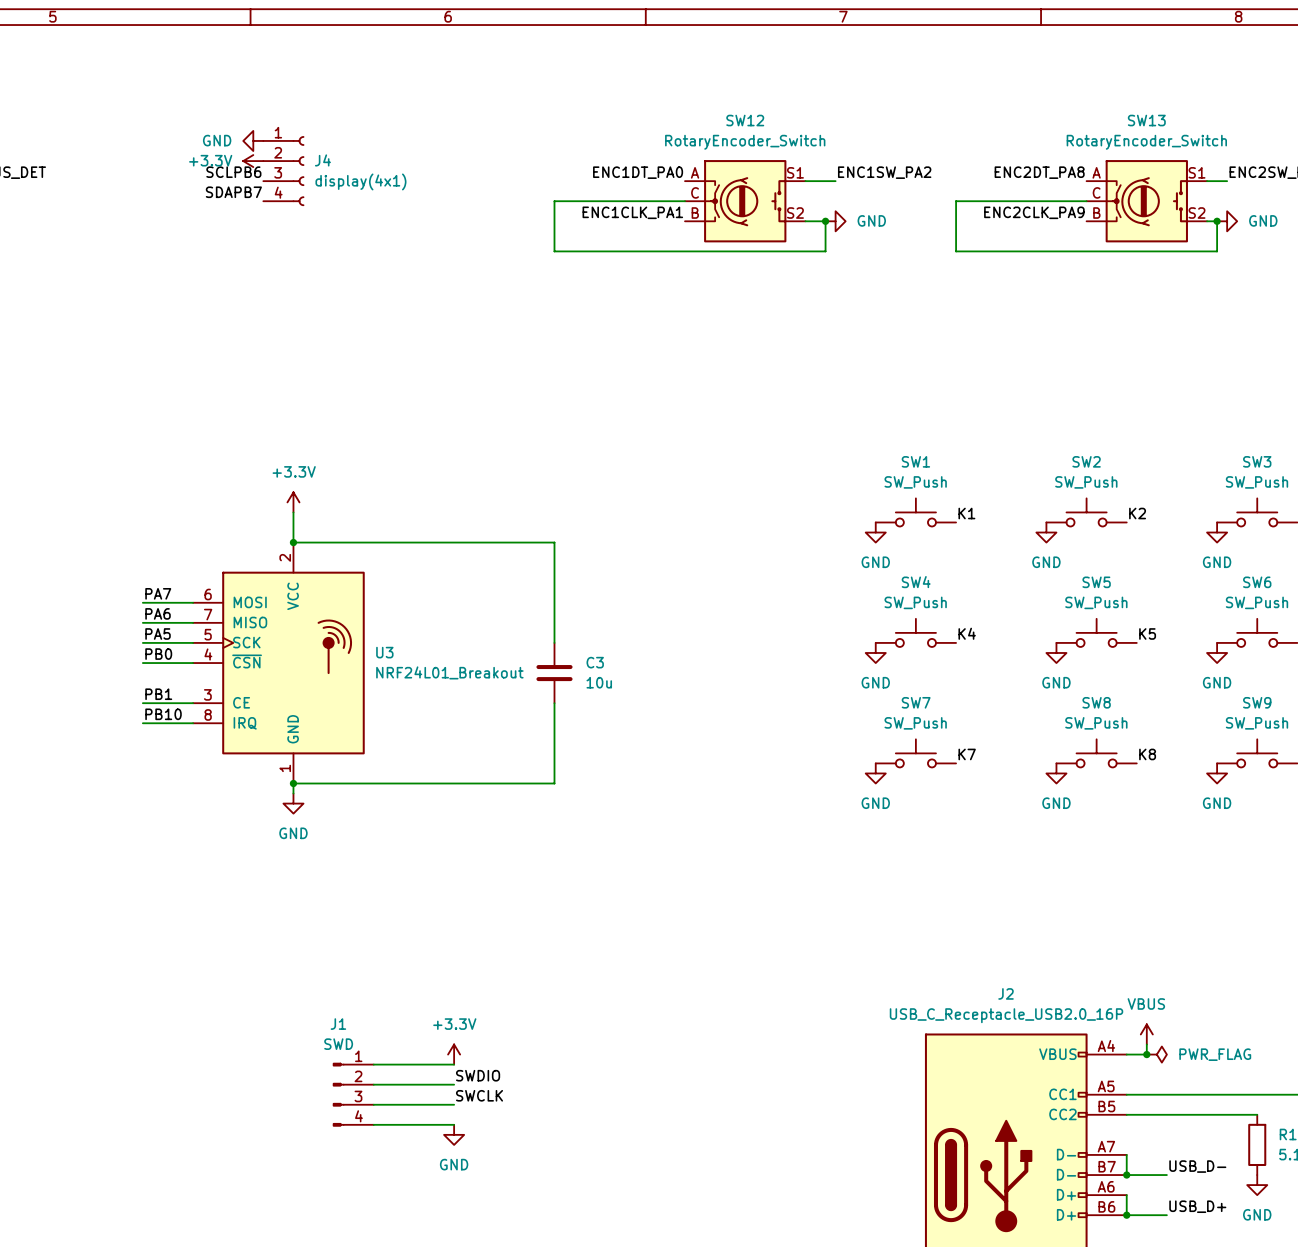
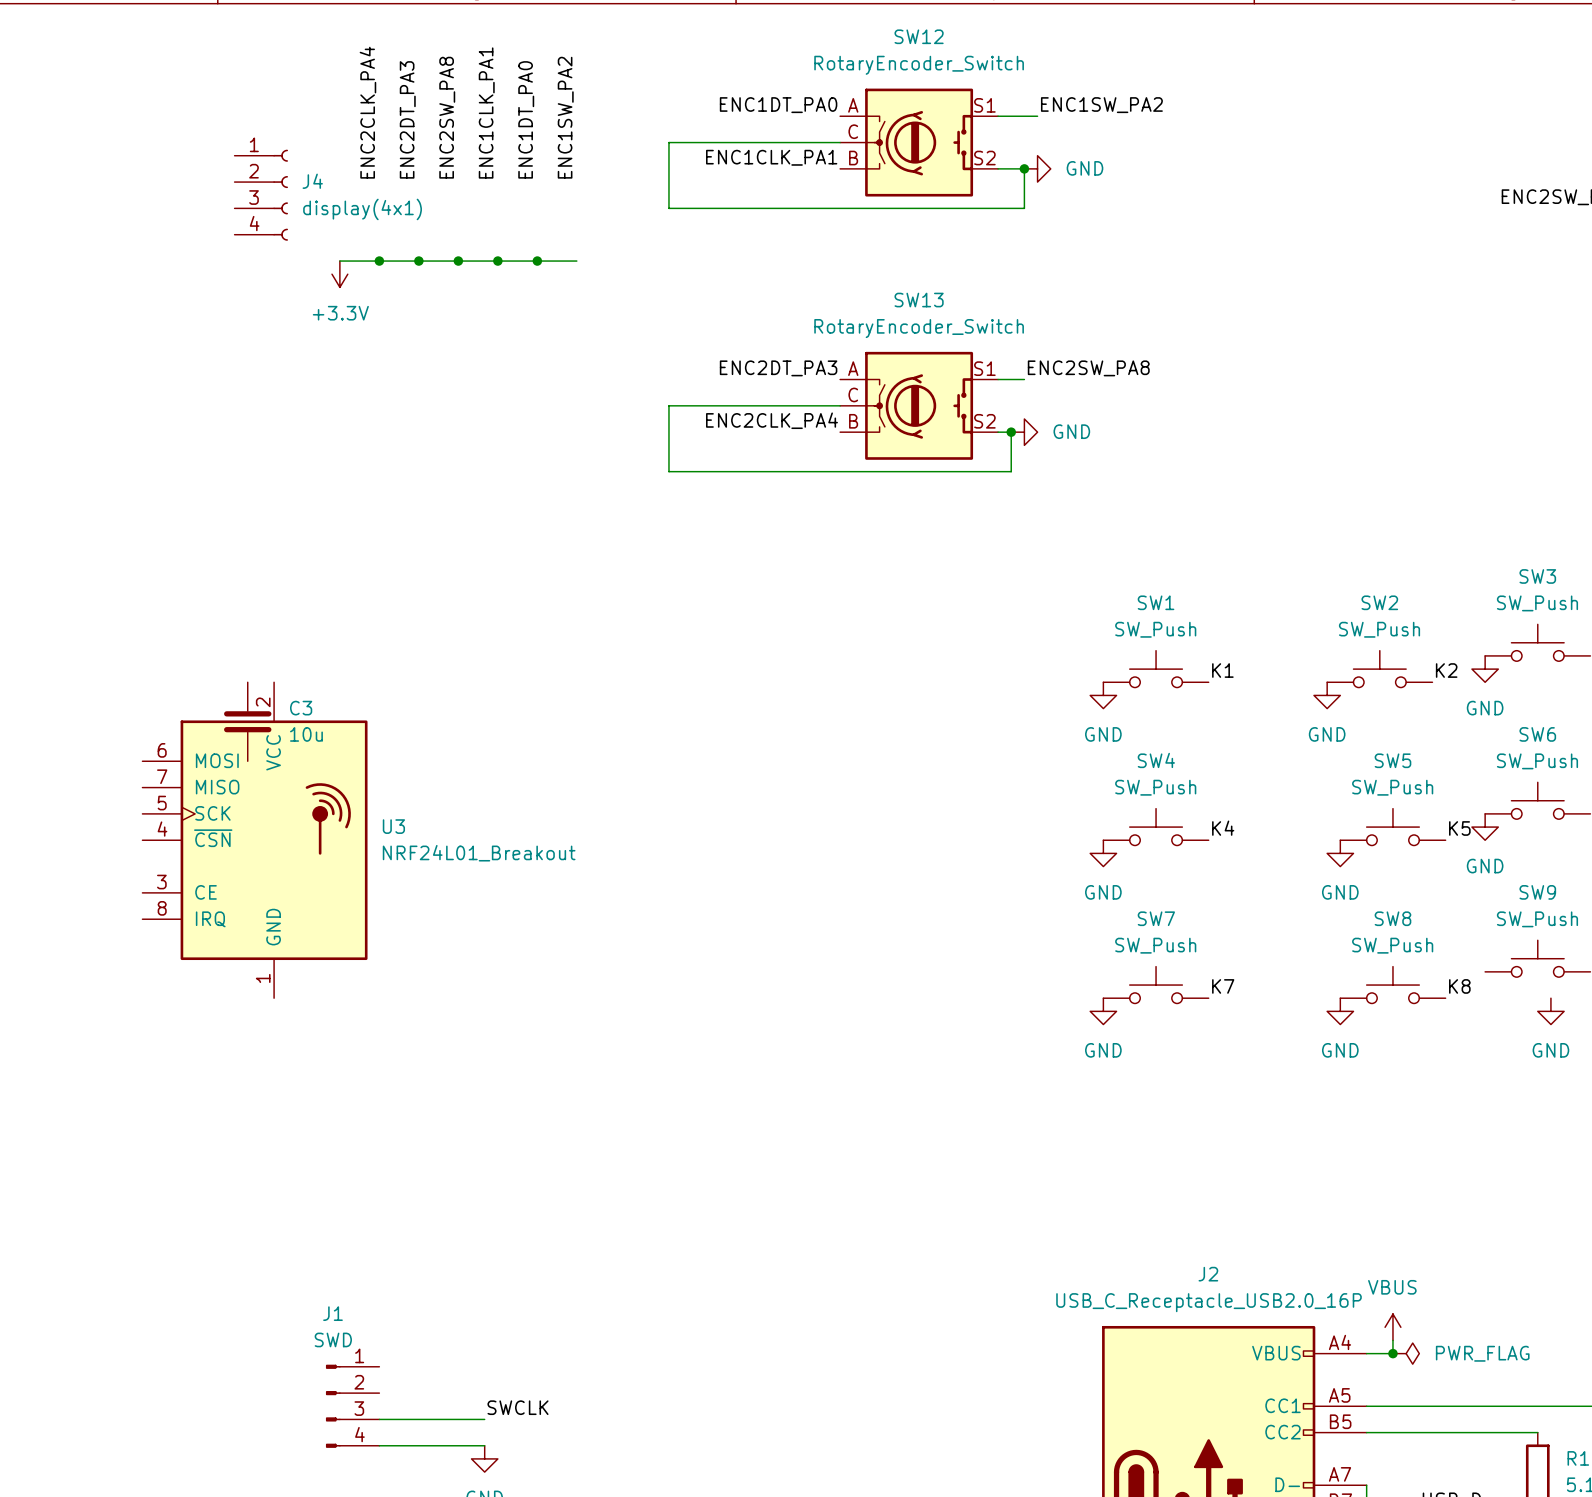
label: none -> ENC2CLK_PA4 (367, 112)
label: none -> ENC1CLK_PA1 (486, 113)
wire: none -> (998, 116) (1037, 116)
label: none -> ENC2SW_PA8 (447, 117)
label: none -> ENC1SW_PA2 (565, 117)
label: none -> ENC2DT_PA3 (407, 119)
label: none -> ENC1DT_PA0 (526, 119)
wire: none -> (840, 142) (668, 142) (668, 208) (945, 208)
power symbol: GND (253, 140) -> none
wire: none -> (998, 168) (1024, 168) (1024, 208) (984, 208)
junction: none -> (1024, 168)
power symbol: none -> GND (1037, 168)
power symbol text position: +3.3V (210, 160) -> +3.3V (340, 313)
power symbol rotation: 0° (253, 161) -> 90° counterclockwise (339, 274)
power symbol position: +3.3V (253, 161) -> +3.3V (339, 274)
label: SCLPB6 (233, 172) -> none
label position: ENC1DT_PA0 (638, 172) -> ENC1DT_PA0 (778, 105)
label position: ENC1SW_PA2 (884, 172) -> ENC1SW_PA2 (1101, 105)
label: ENC2DT_PA8 (1039, 172) -> none
wire: (1207, 181) (1227, 181) -> none
label: SDAPB7 (233, 192) -> none
wire: (685, 201) (554, 201) (554, 251) (825, 251) (825, 221) (805, 221) -> none
SW12 position: (745, 201) -> (919, 142)
wire: (1086, 201) (956, 201) (956, 251) (1217, 251) (1217, 221) (1207, 221) -> none
SW13 position: (1146, 201) -> (919, 405)
label position: ENC1CLK_PA1 (632, 212) -> ENC1CLK_PA1 (771, 157)
label: ENC2CLK_PA9 (1034, 212) -> none
wire: none -> (339, 261) (576, 261)
junction: none -> (379, 261)
junction: none -> (418, 261)
junction: none -> (458, 261)
junction: none -> (497, 261)
junction: none -> (537, 261)
junction: (825, 221) -> none
power symbol: GND (835, 221) -> none
junction: (1217, 221) -> none
power symbol: GND (1227, 221) -> none
label: none -> ENC2DT_PA3 (778, 368)
label: none -> ENC2SW_PA8 (1088, 368)
wire: none -> (998, 379) (1024, 379)
wire: none -> (840, 405) (668, 405) (668, 471) (1011, 471) (1011, 432) (998, 432)
label: none -> ENC2CLK_PA4 (771, 420)
junction: none -> (1011, 432)
power symbol: none -> GND (1024, 432)
power symbol: +3.3V (293, 502) -> none
wire: (293, 512) (293, 542) (554, 542) (554, 642) -> none
SW1 position: (915, 512) -> (1156, 669)
SW2 position: (1086, 512) -> (1379, 669)
label position: K1 (966, 513) -> K1 (1222, 670)
label position: K2 (1137, 513) -> K2 (1446, 670)
power symbol position: GND (875, 532) -> GND (1103, 695)
power symbol: GND (1046, 532) -> none
junction: (293, 542) -> none
power symbol: none -> GND (1327, 695)
label: PA7 (158, 593) -> none
wire: (142, 602) (193, 602) -> none
label: PA6 (158, 613) -> none
wire: (142, 622) (193, 622) -> none
SW4 position: (915, 632) -> (1156, 827)
SW5 position: (1096, 632) -> (1392, 827)
label: PA5 (158, 633) -> none
label position: K4 (967, 633) -> K4 (1223, 828)
label position: K5 (1147, 633) -> K5 (1459, 828)
wire: (142, 642) (193, 642) -> none
power symbol position: GND (875, 652) -> GND (1103, 853)
power symbol: GND (1056, 652) -> none
label: PB0 (158, 654) -> none
wire: (142, 663) (193, 663) -> none
C3 position: (554, 673) -> (247, 721)
power symbol: none -> GND (1340, 853)
label: PB1 (158, 694) -> none
wire: (142, 703) (193, 703) -> none
wire: (554, 703) (554, 783) (293, 783) (293, 793) -> none
label: PB10 (163, 714) -> none
wire: (142, 723) (193, 723) -> none
SW7 position: (915, 753) -> (1156, 985)
SW8 position: (1096, 753) -> (1392, 985)
label position: K7 (967, 754) -> K7 (1223, 986)
label position: K8 (1147, 754) -> K8 (1459, 986)
power symbol position: GND (875, 773) -> GND (1103, 1011)
power symbol position: GND (1056, 773) -> GND (1340, 1011)
power symbol position: GND (1217, 773) -> GND (1550, 1011)
junction: (293, 783) -> none
power symbol: GND (293, 803) -> none
power symbol: +3.3V (454, 1054) -> none
wire: (373, 1064) (454, 1064) -> none
label: SWDIO (478, 1075) -> none
wire: (373, 1084) (454, 1084) -> none

